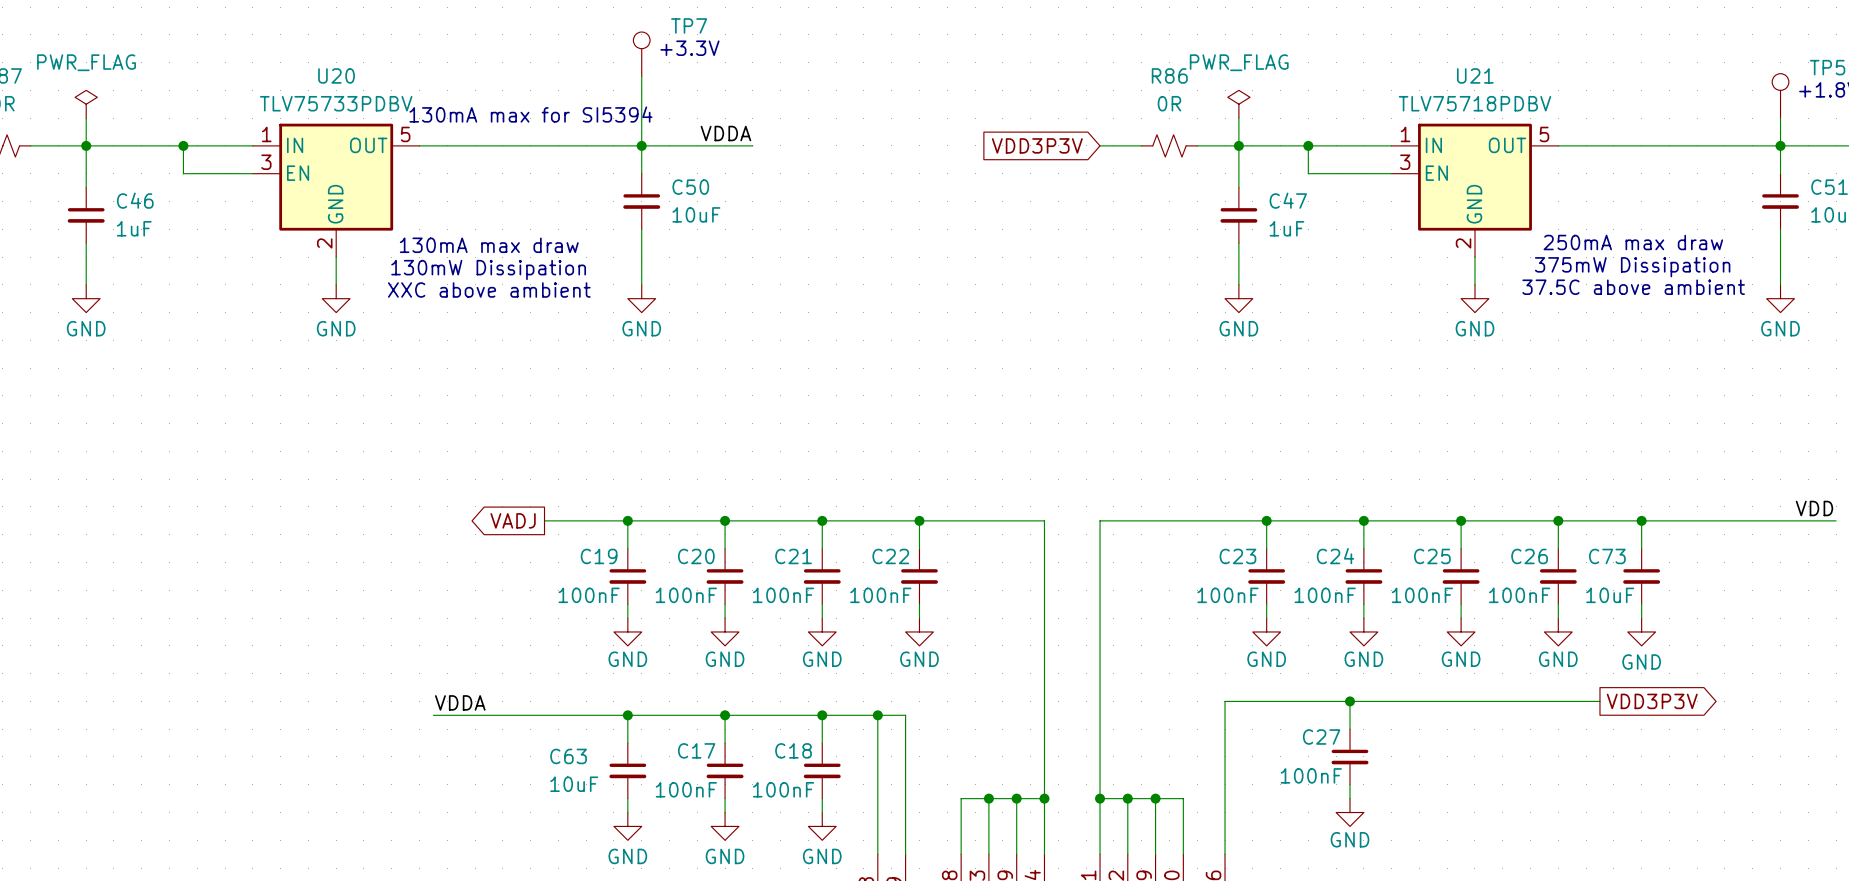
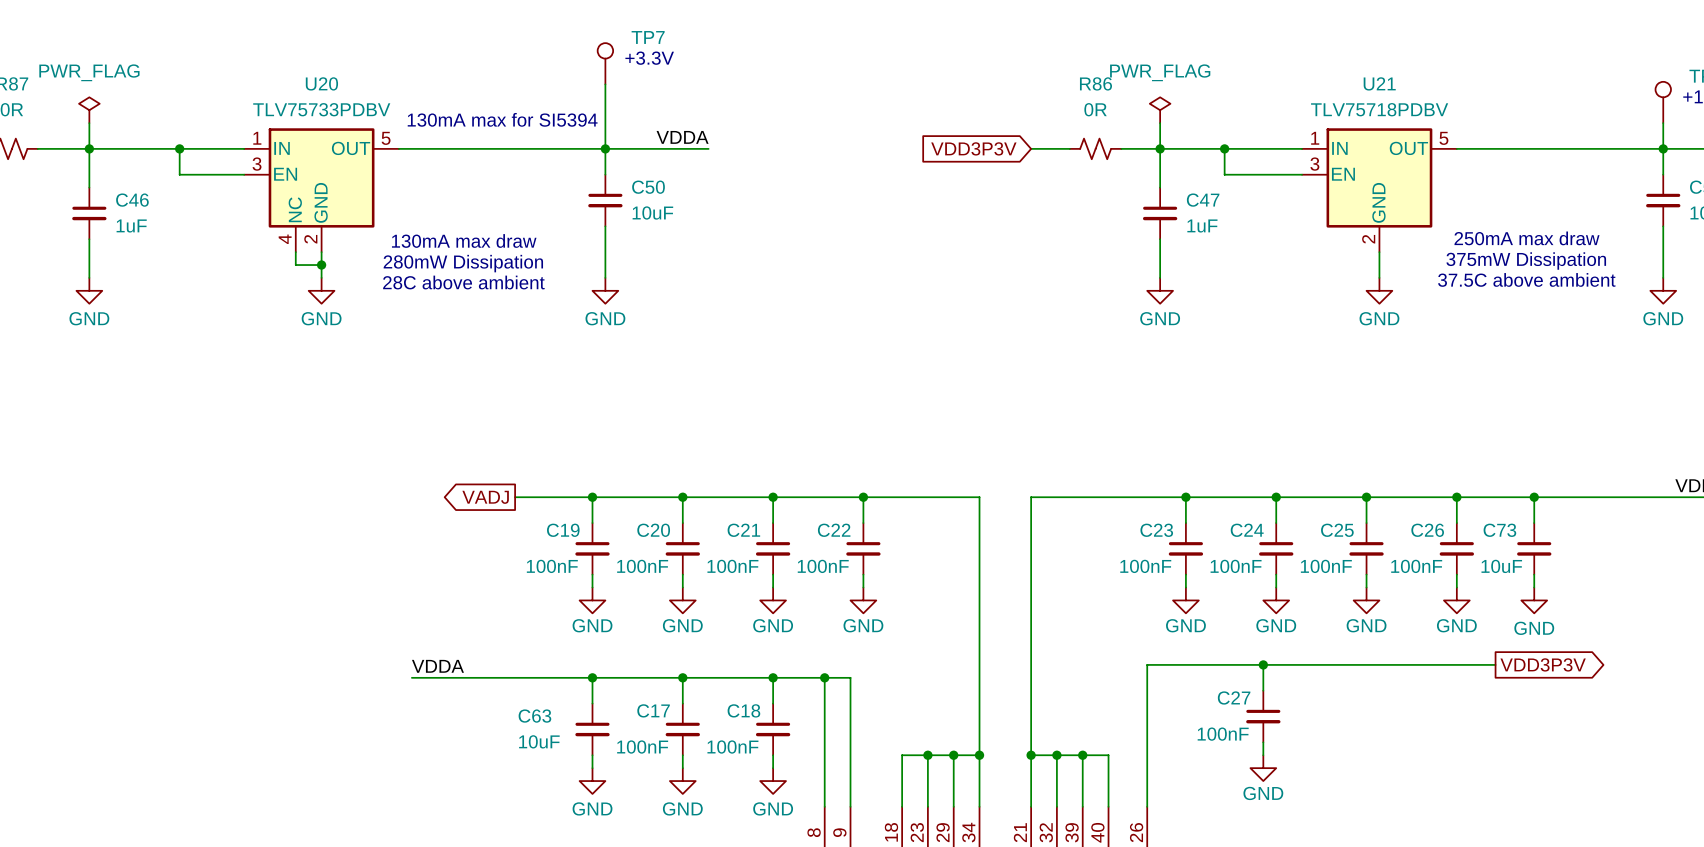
U20 symbol: [252, 123, 420, 258] -> [244, 128, 399, 253]
wire: none -> (295, 252) (295, 265) (321, 265)
text: 130mW Dissipation (488, 269) -> 280mW Dissipation (463, 263)
junction: none -> (321, 265)
text: XXC above ambient (489, 290) -> 28C above ambient (463, 282)

